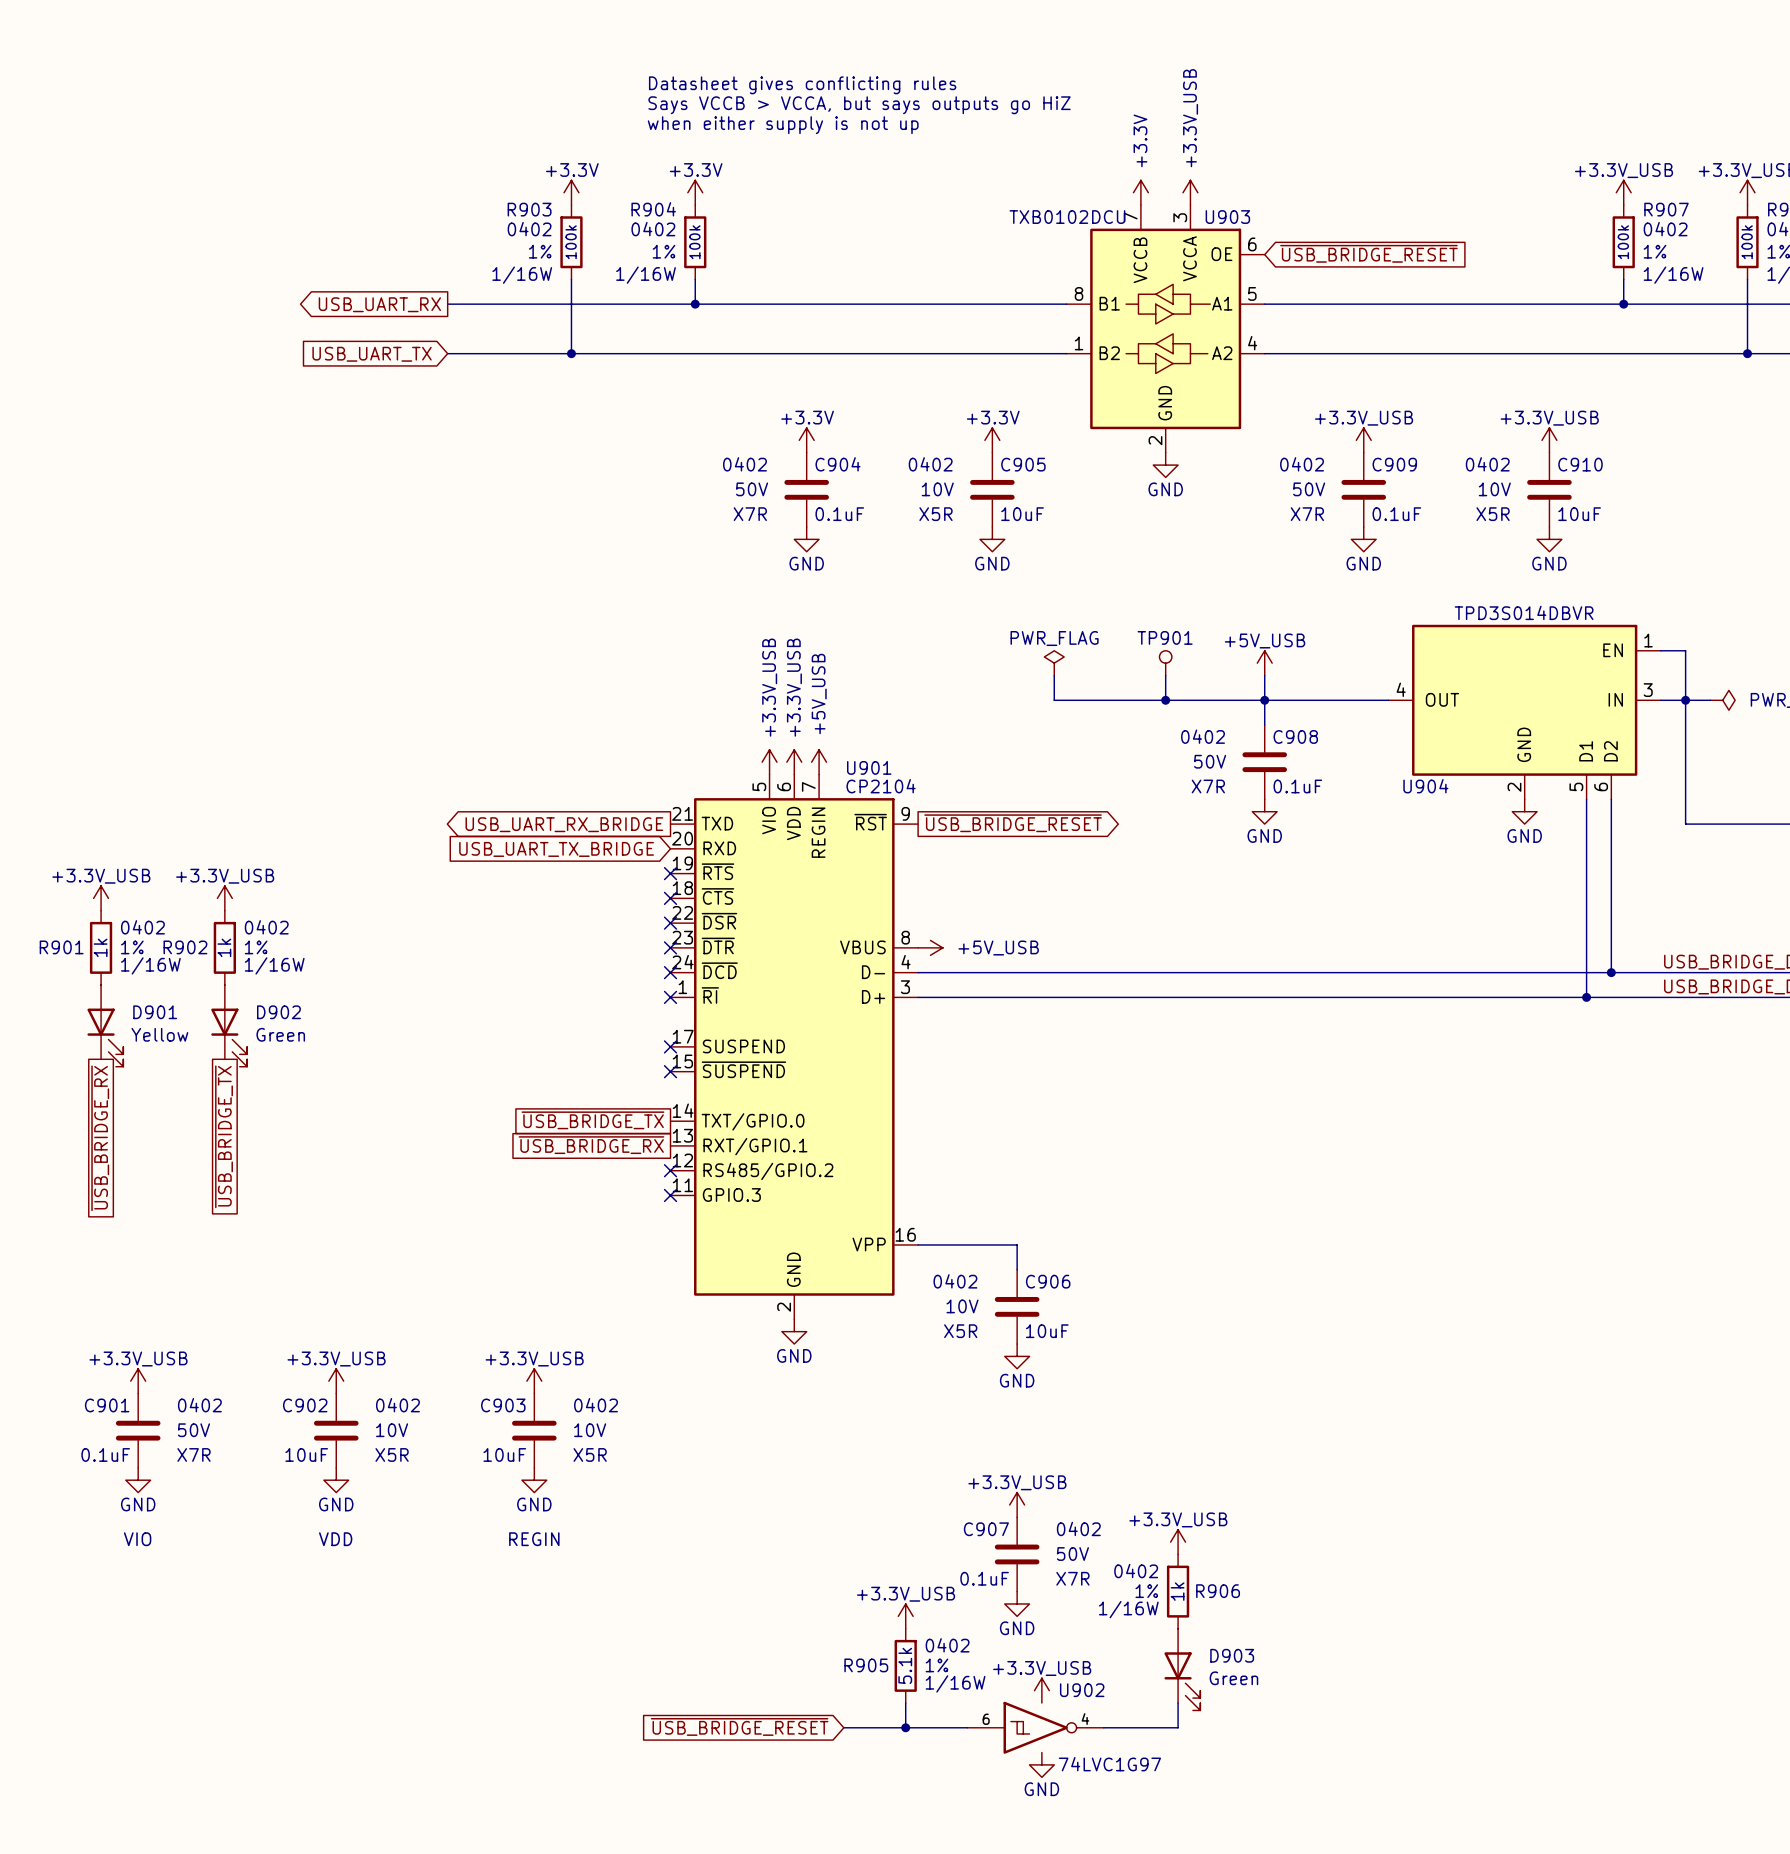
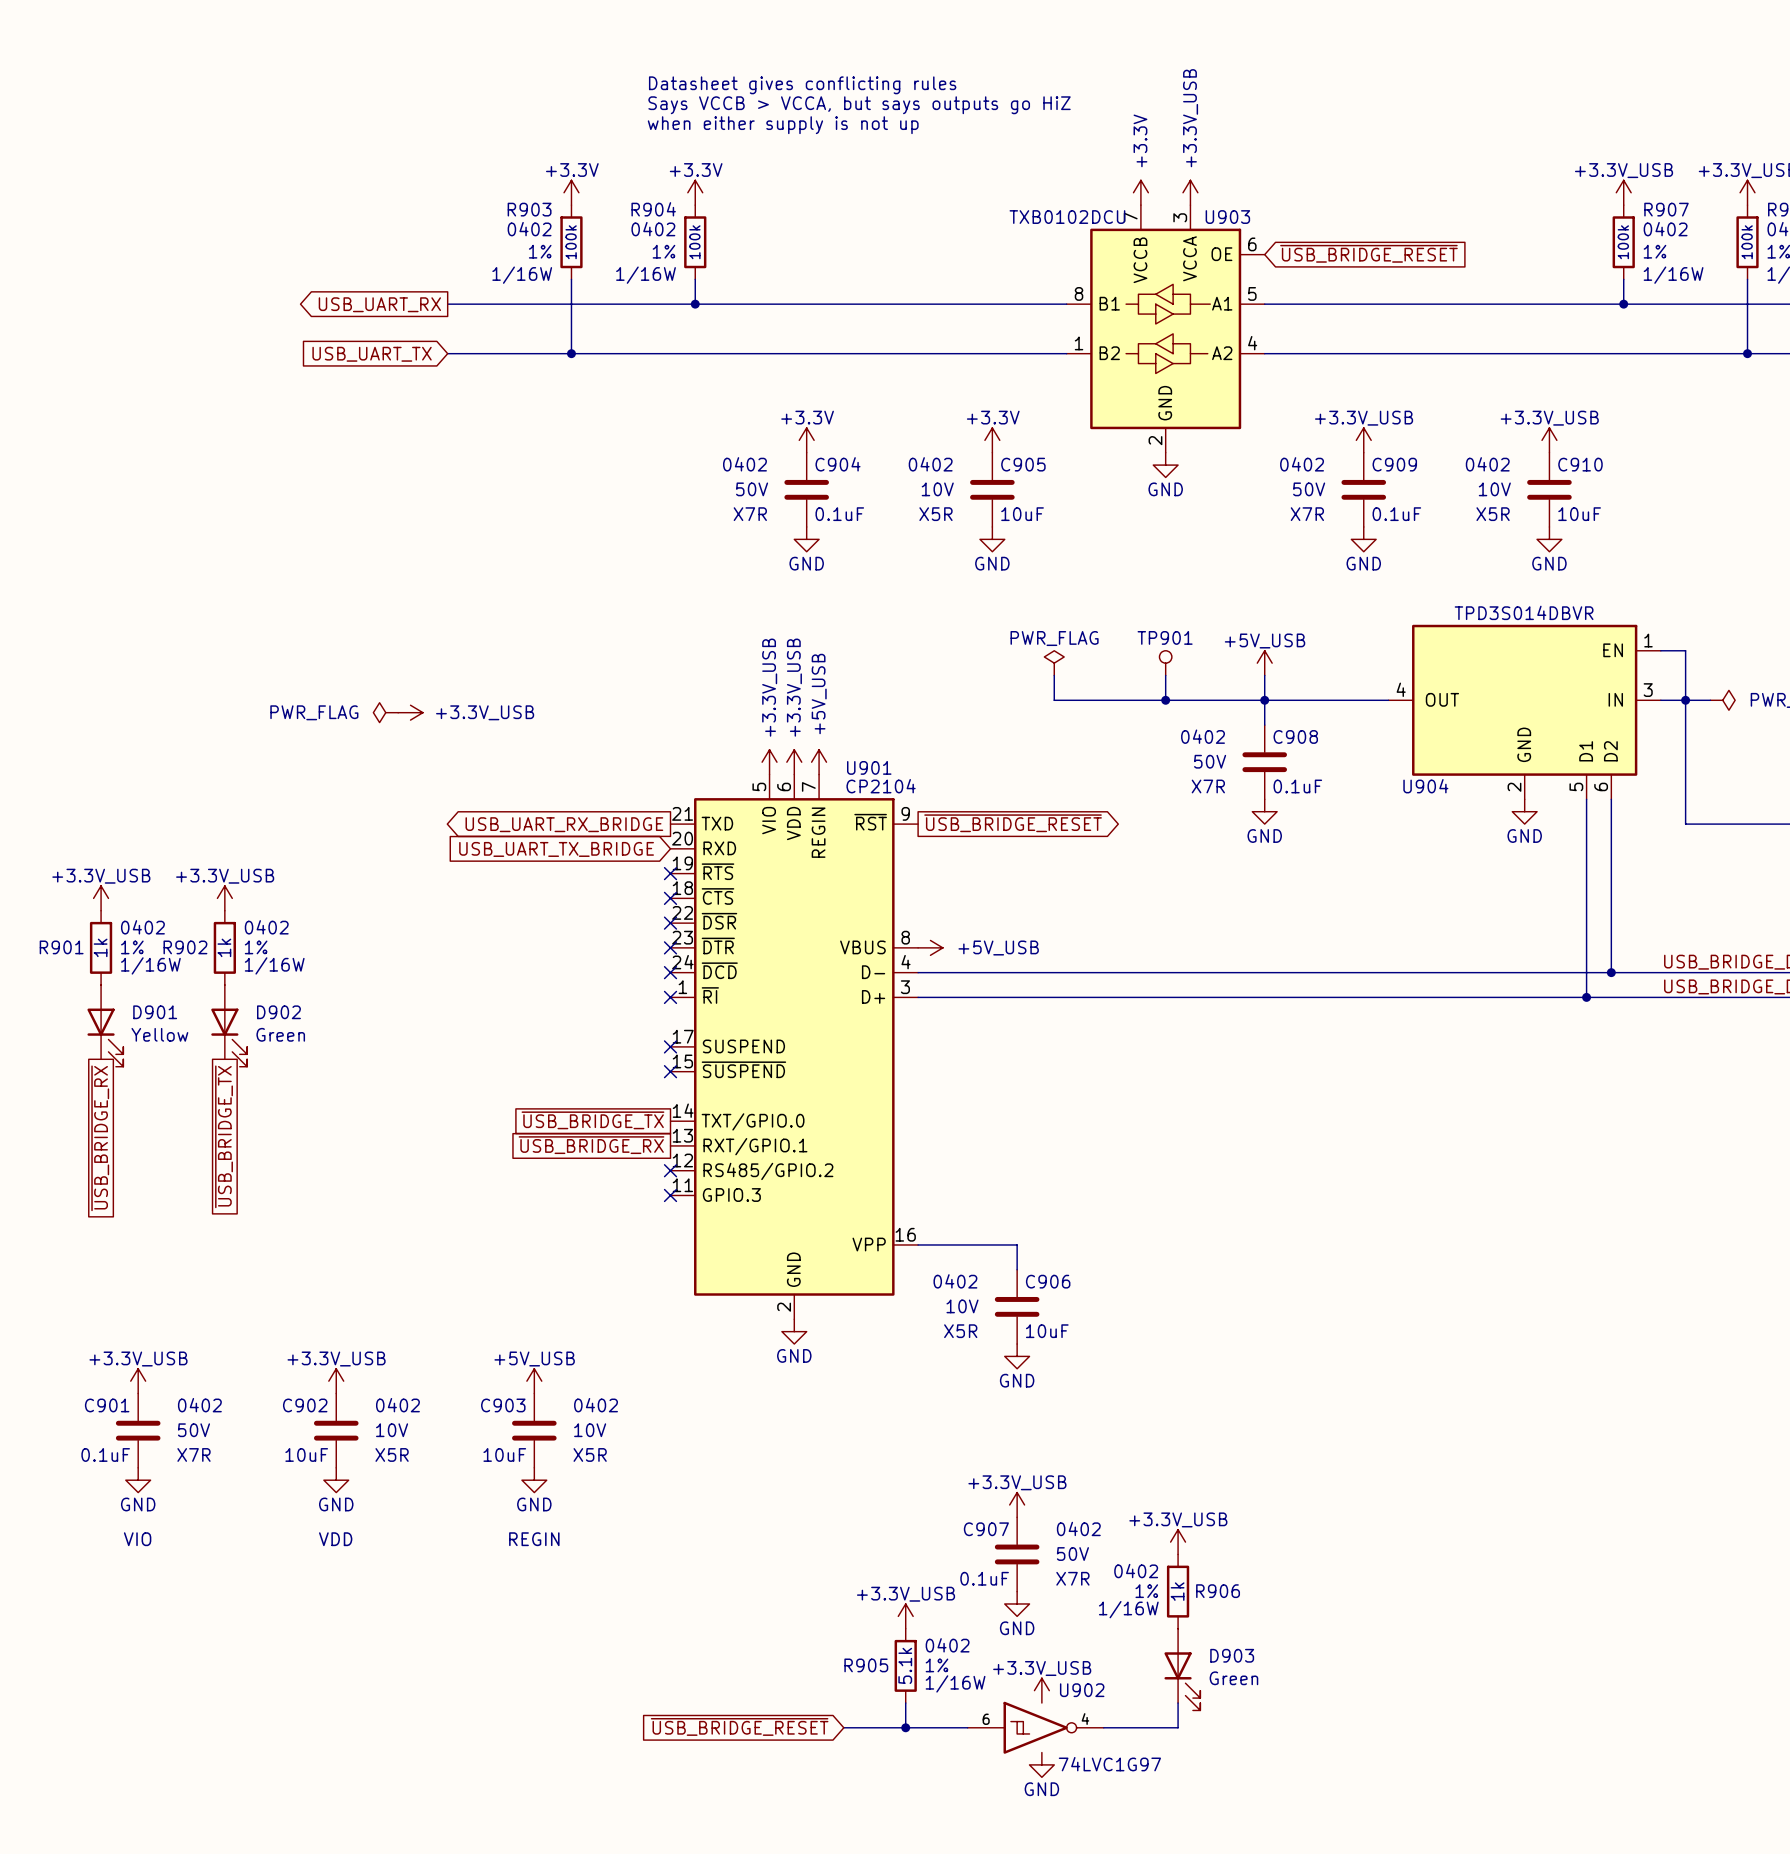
power symbol: none -> PWR_FLAG (385, 712)
power symbol: none -> +3.3V_USB (410, 712)
power symbol: +3.3V_USB (534, 1381) -> +5V_USB (534, 1381)

